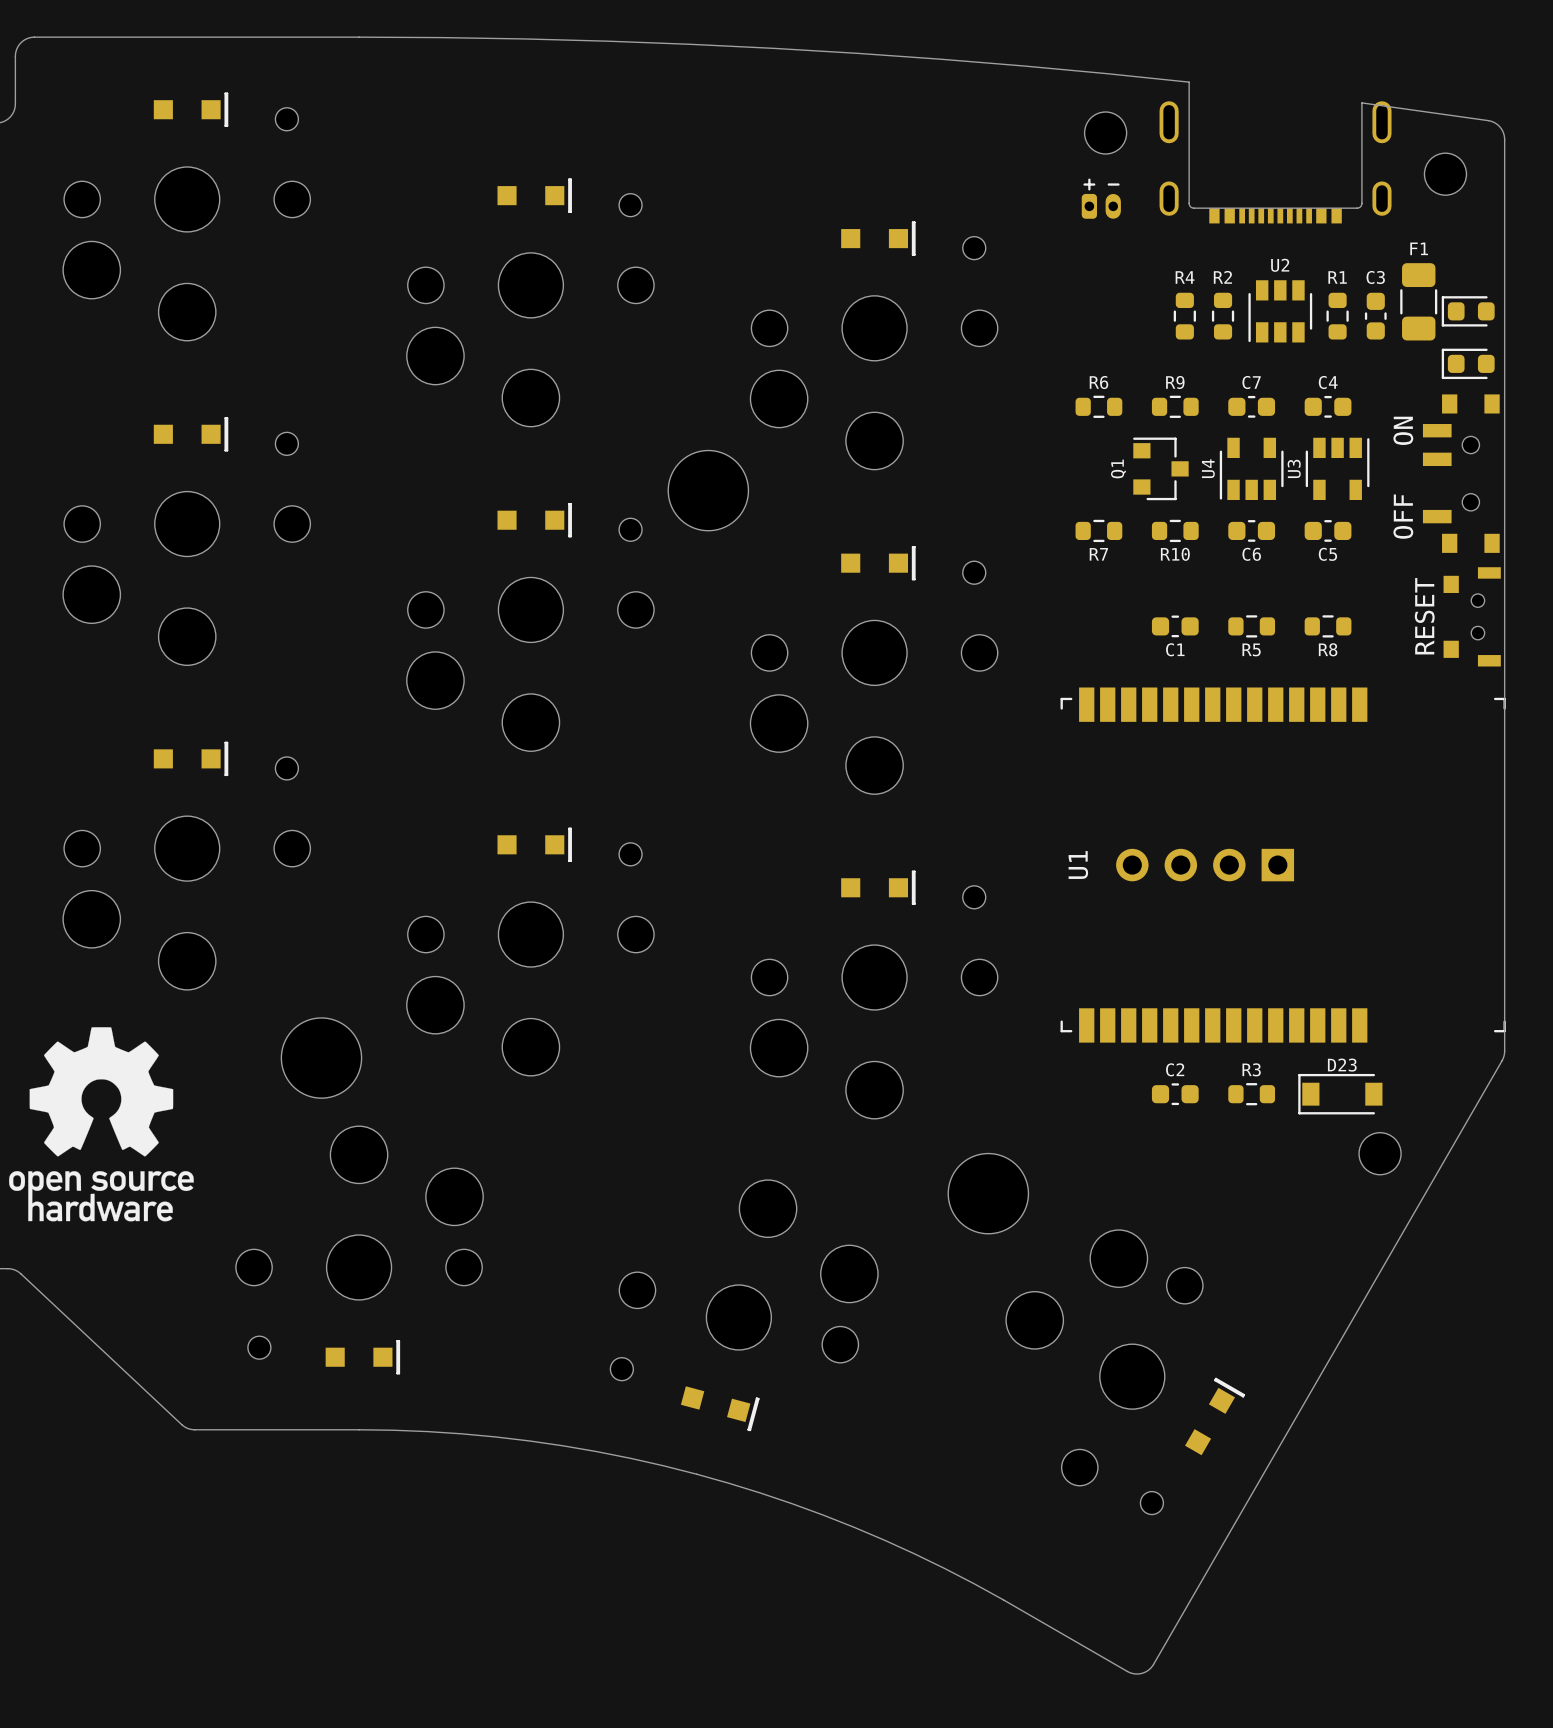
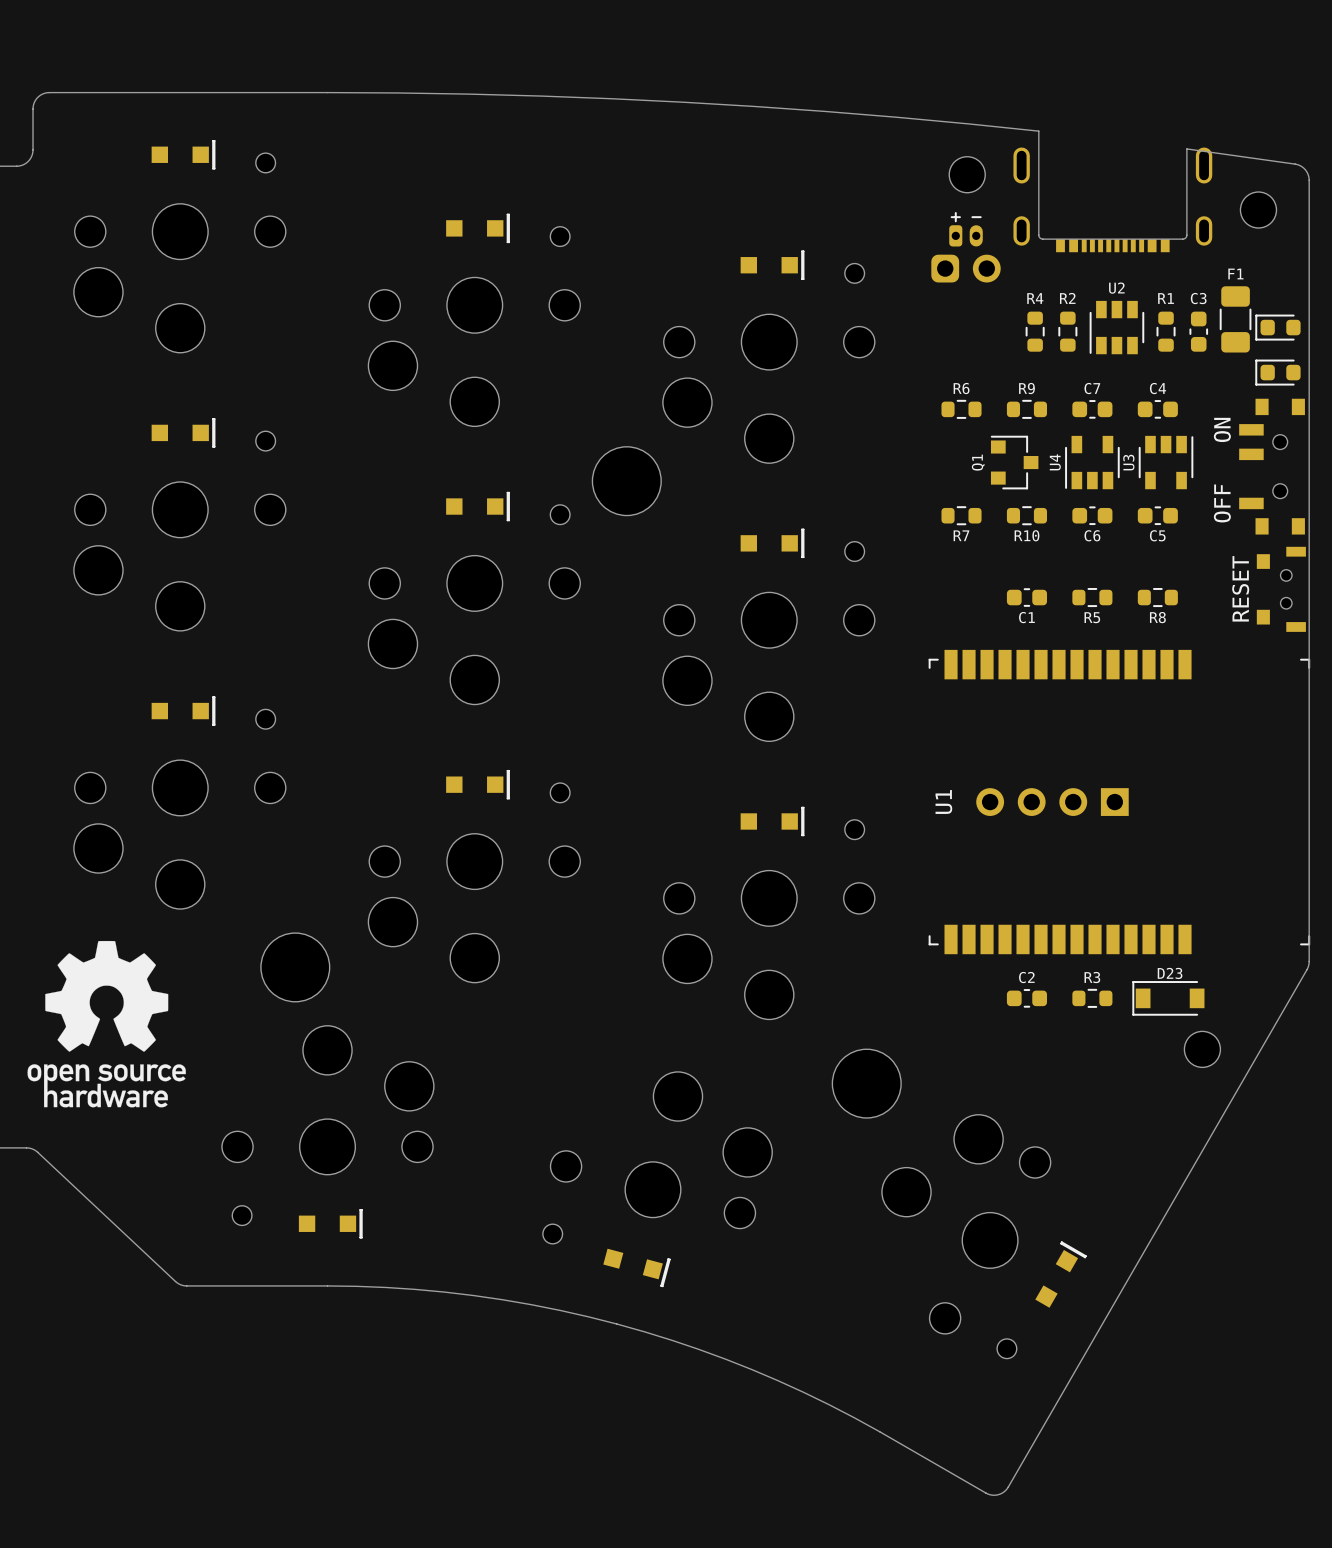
part: (1101, 198) -> none
part: none -> (966, 247)

